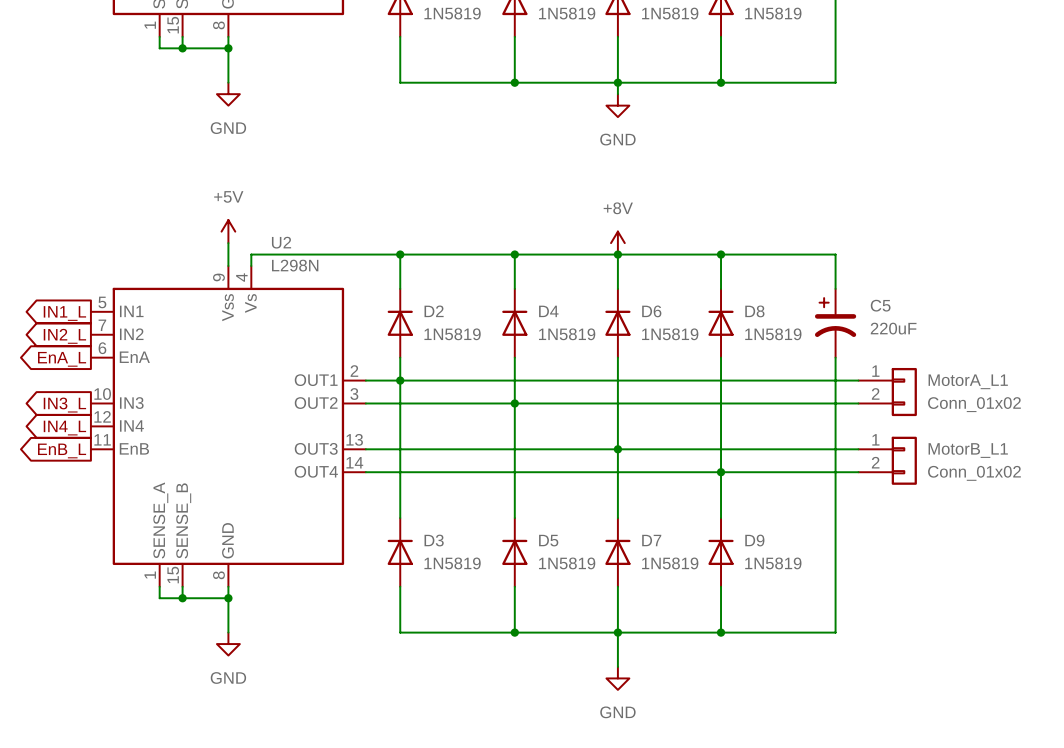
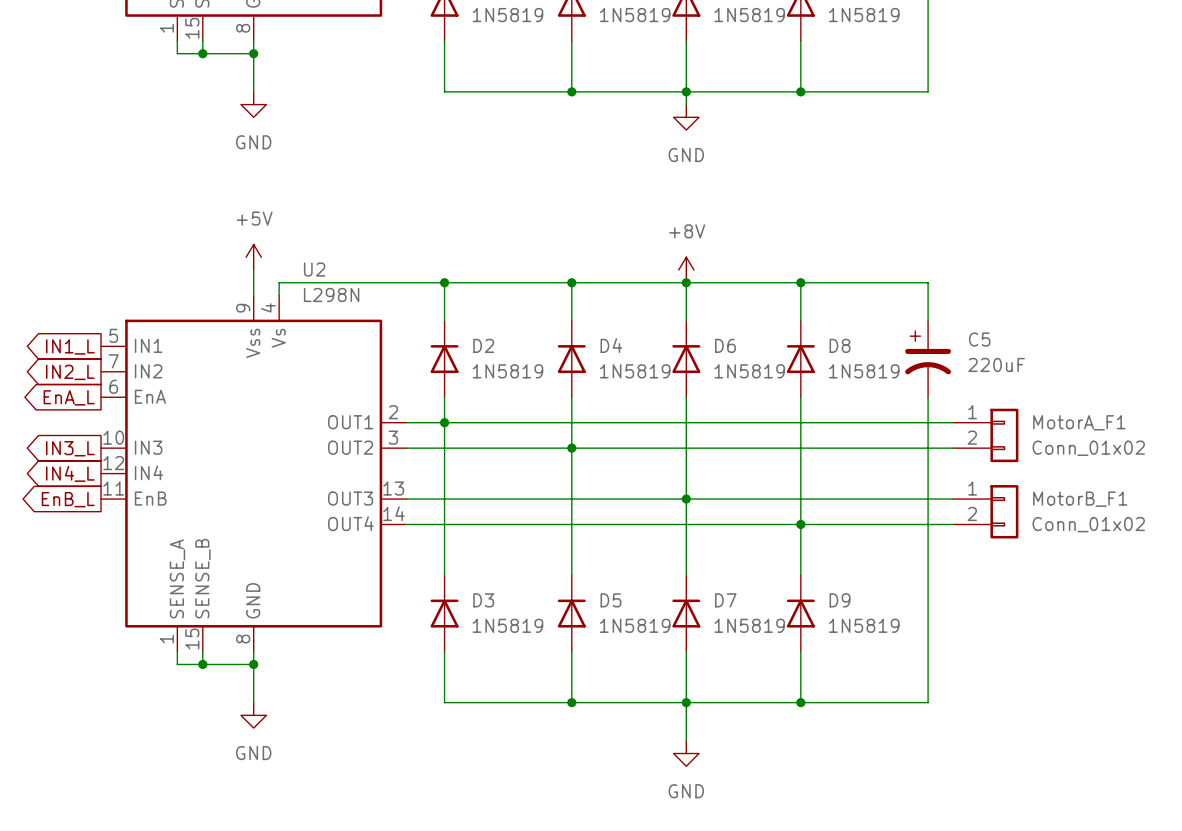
MotorA_L1 name: MotorA_L1 (968, 381) -> MotorA_F1 (1079, 422)
MotorB_L1 name: MotorB_L1 (968, 450) -> MotorB_F1 (1080, 499)

